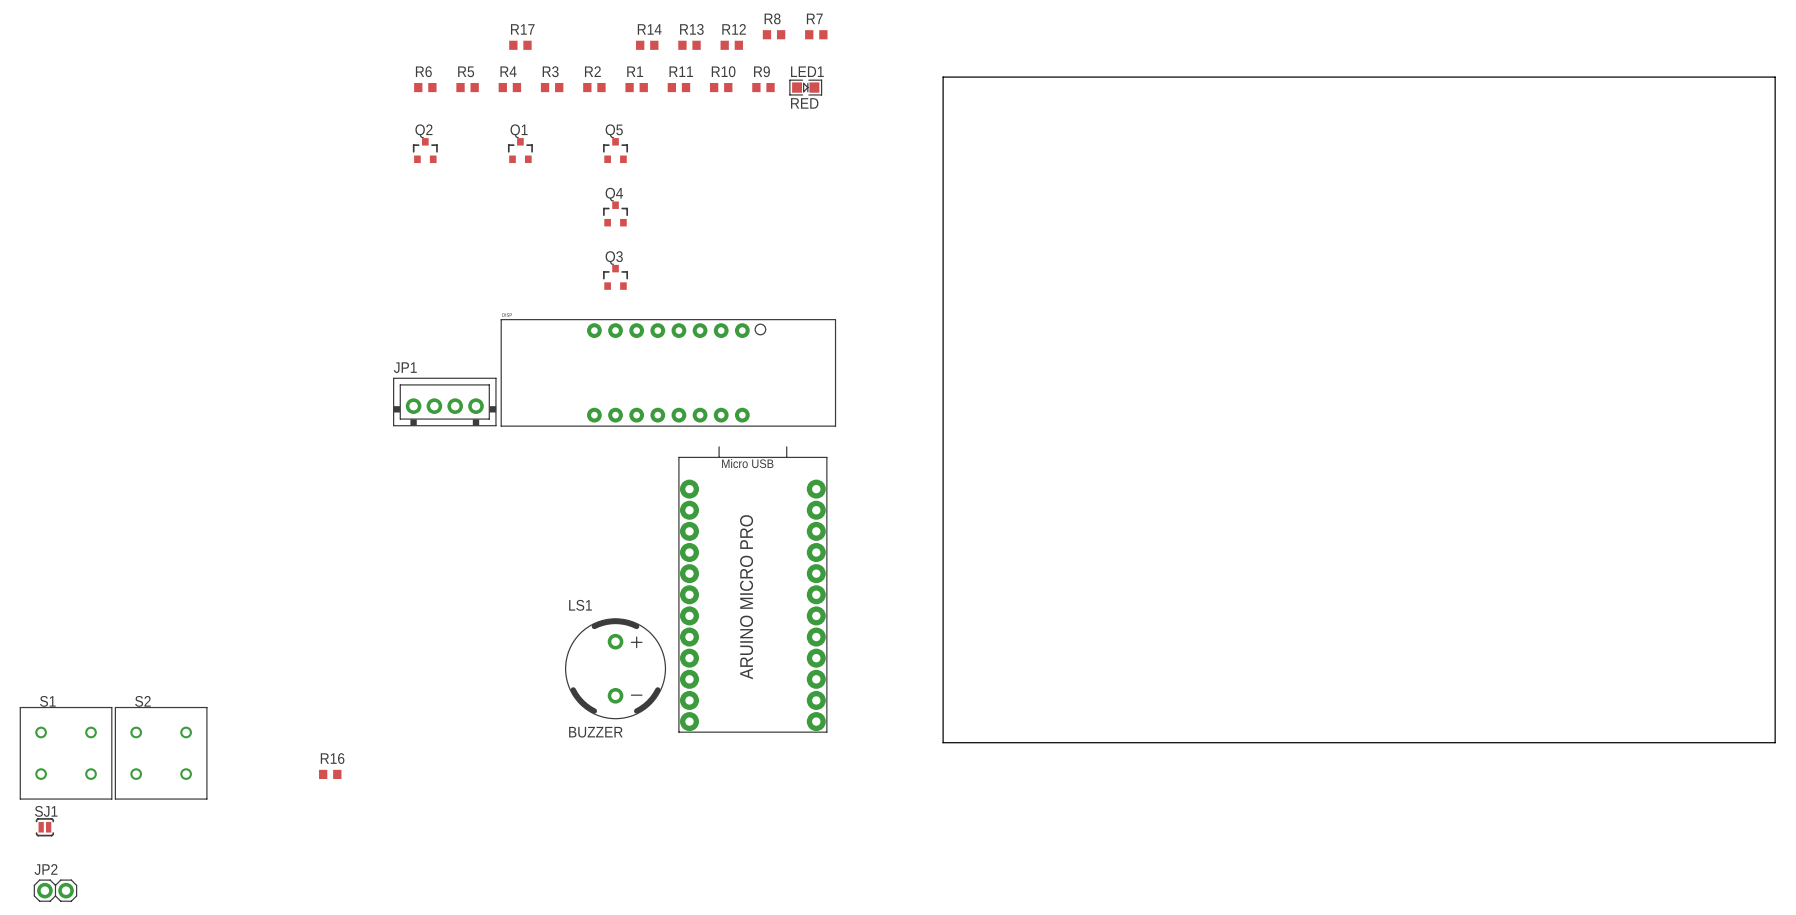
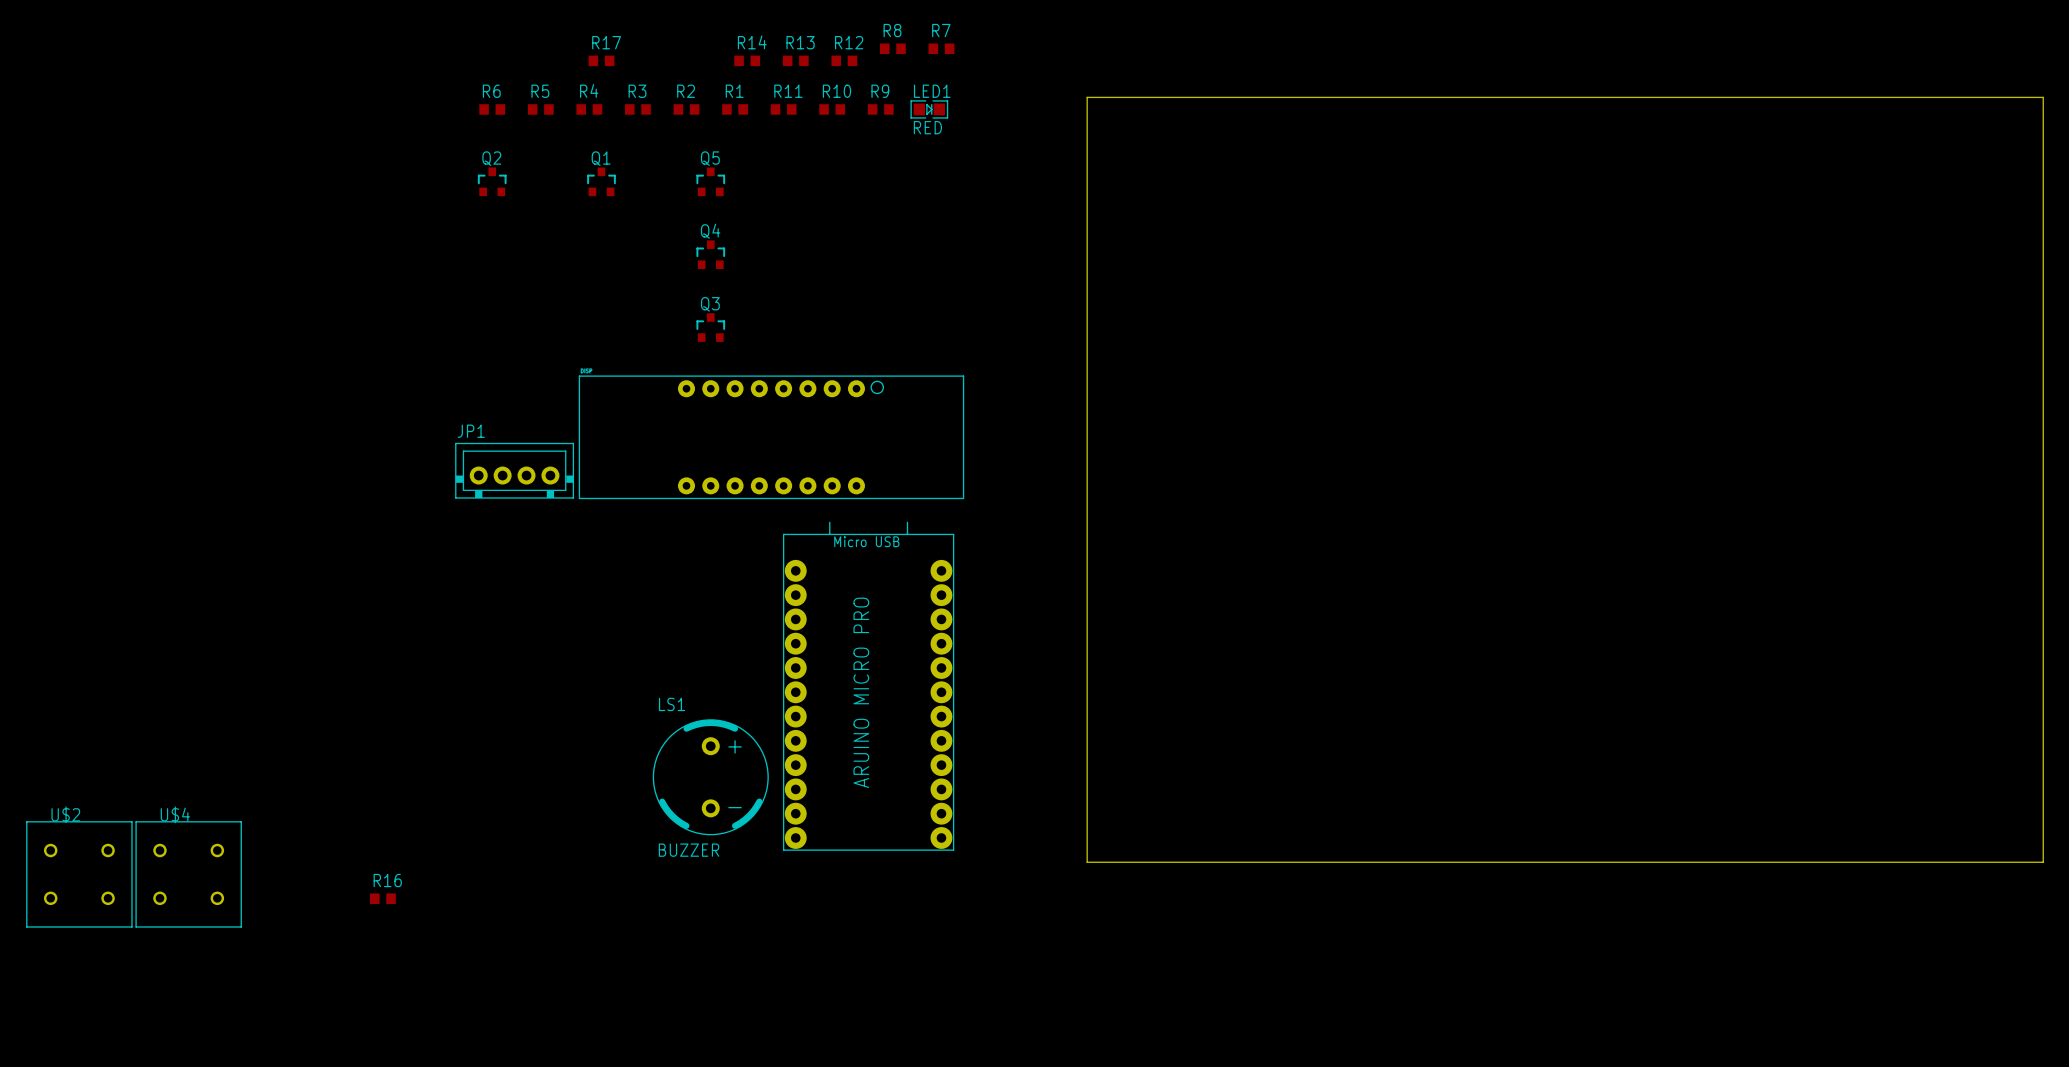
S1 name: S1 (47, 701) -> U$2 (65, 814)
S2 name: S2 (142, 701) -> U$4 (175, 814)
SJ1: (44, 827) -> none
JP2: (55, 890) -> none

